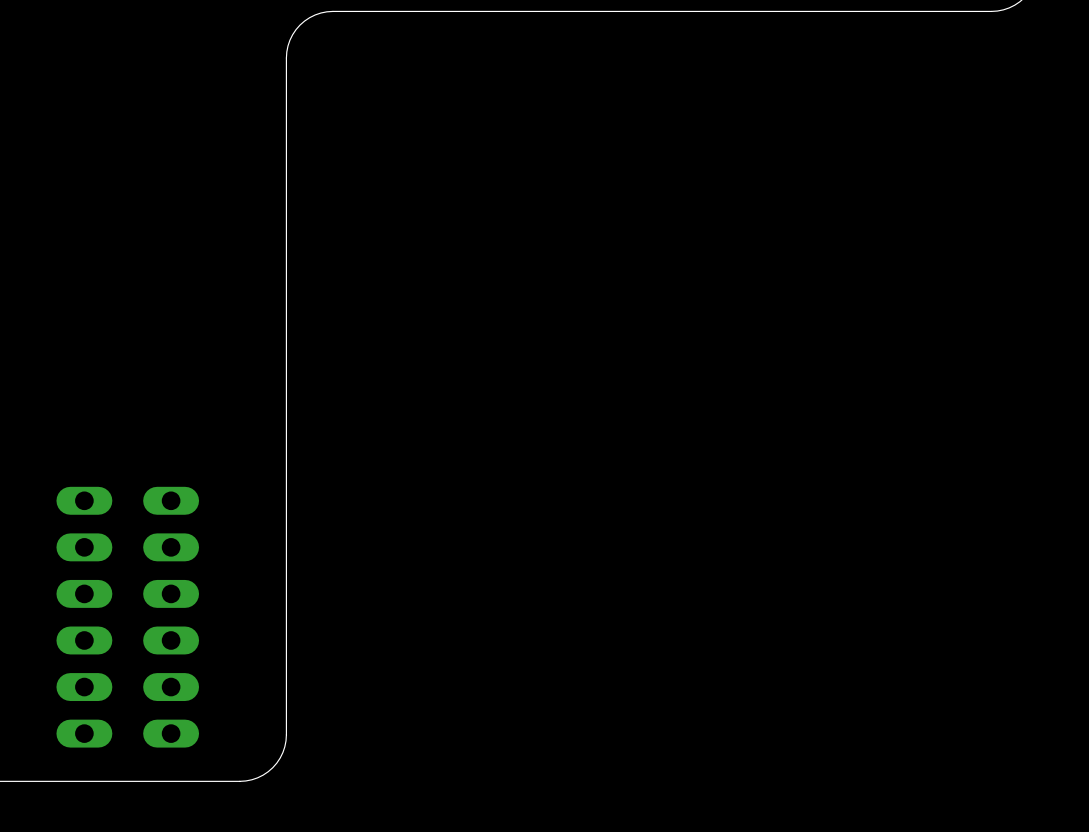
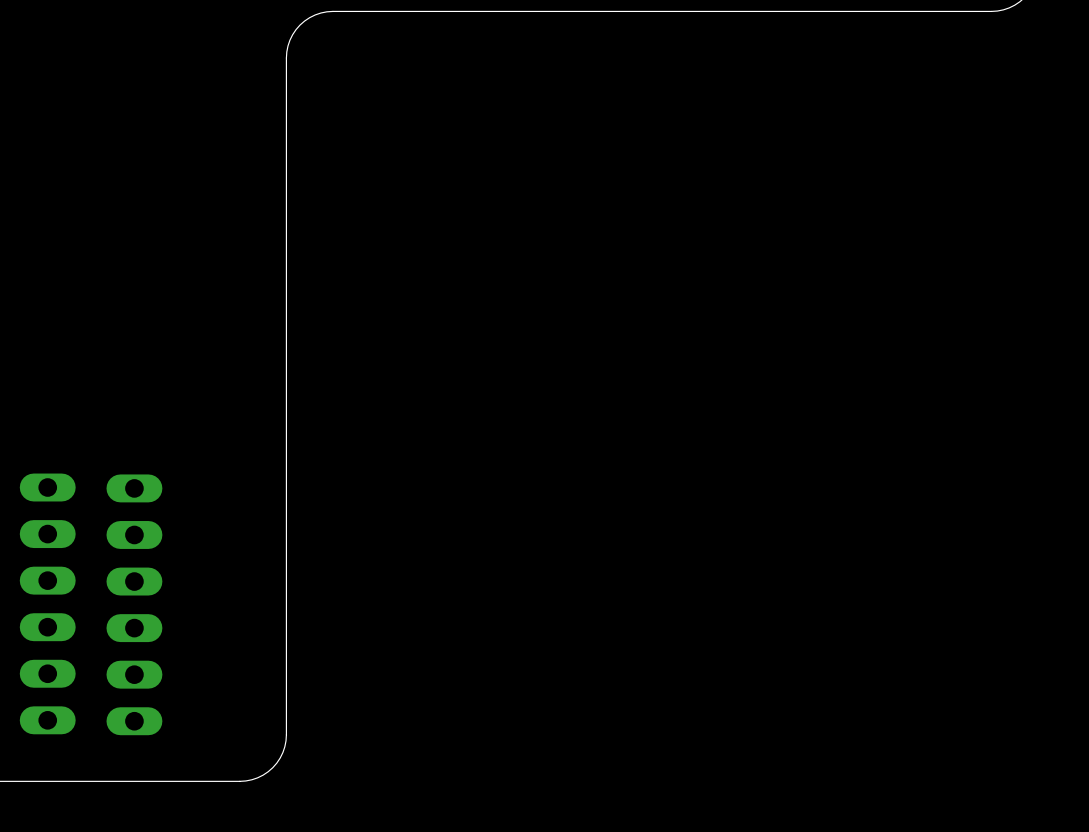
part: none -> (47, 603)
part: none -> (134, 604)
part: (84, 617) -> none
part: (171, 617) -> none

